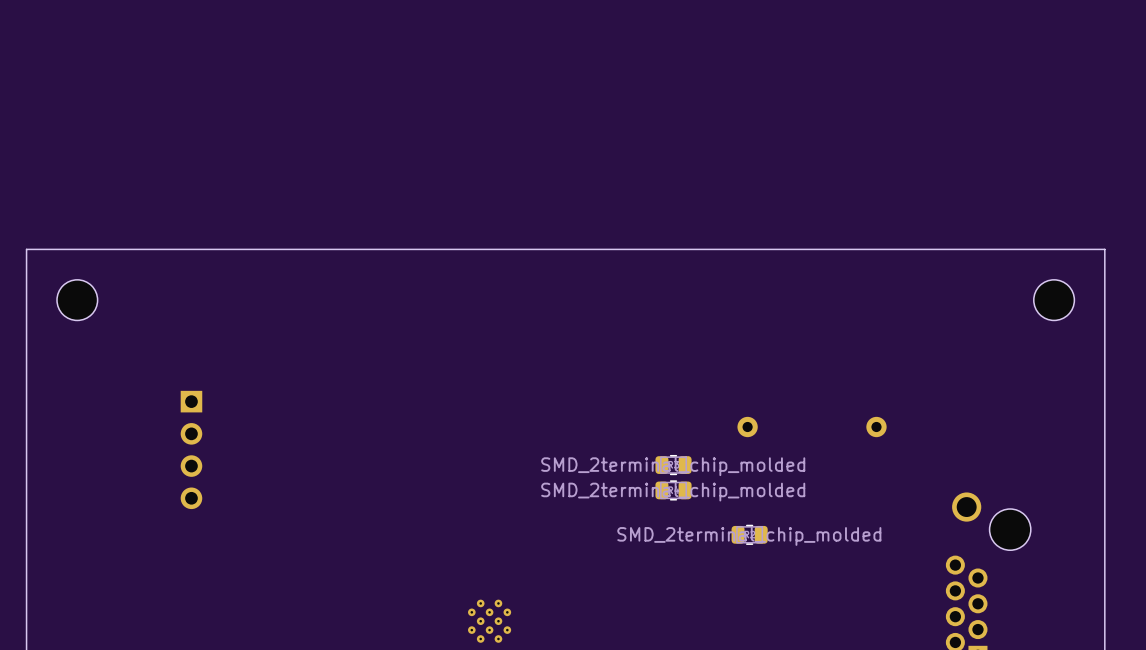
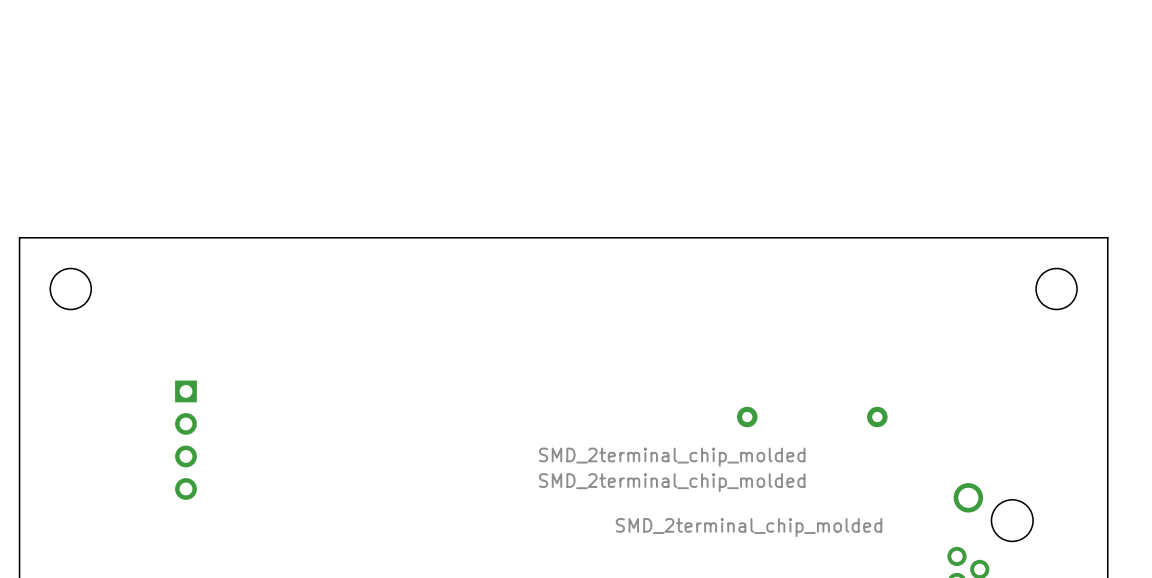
part footprint: [655, 454, 692, 476] -> [538, 447, 806, 467]
part footprint: [655, 480, 692, 501] -> [538, 473, 806, 493]
part footprint: [731, 524, 768, 545] -> [615, 518, 883, 538]

